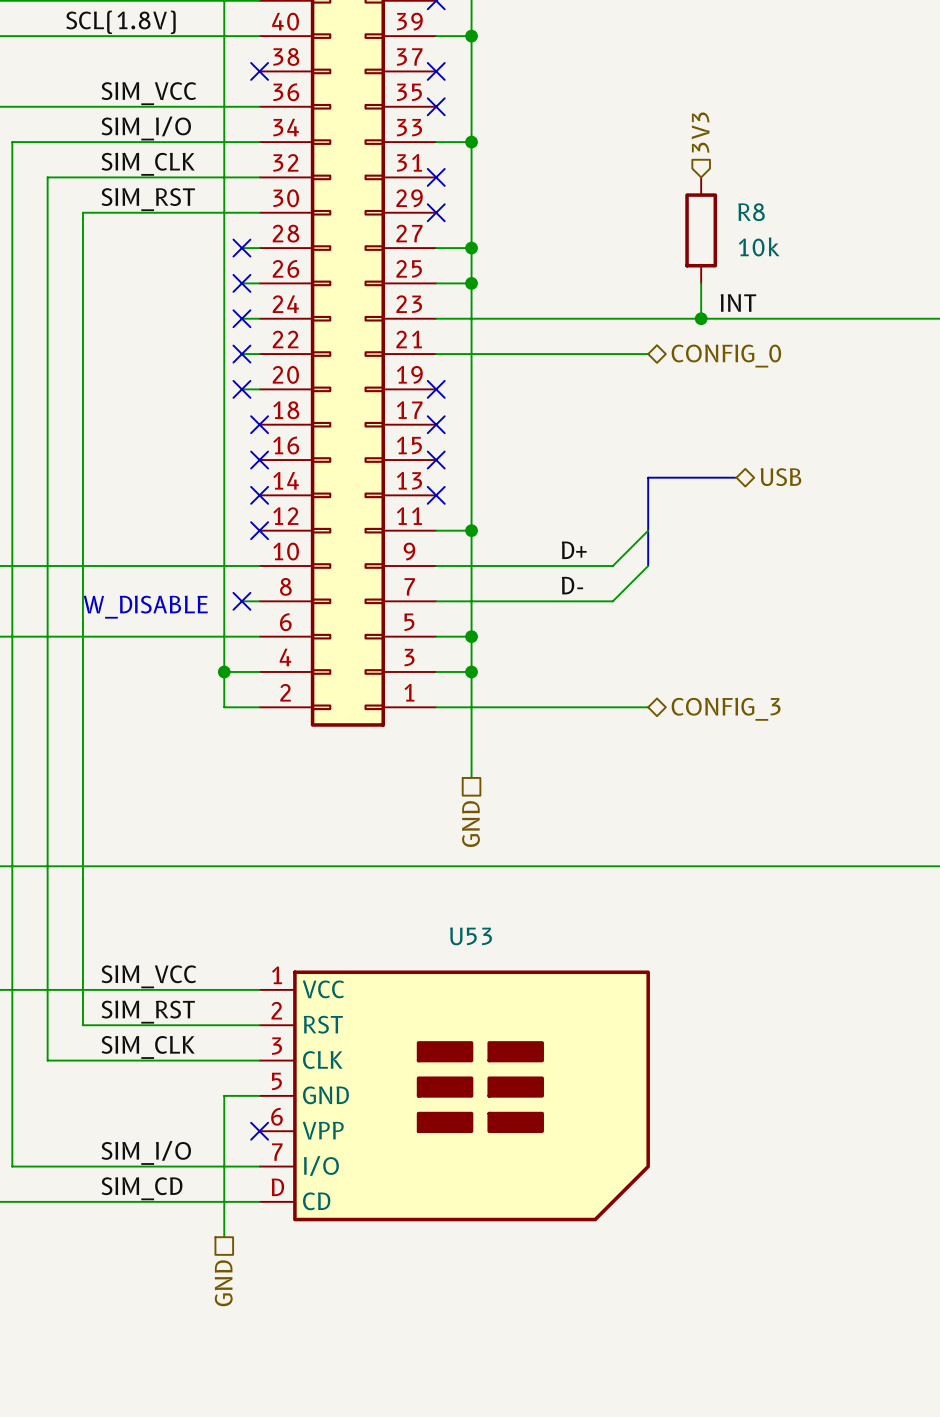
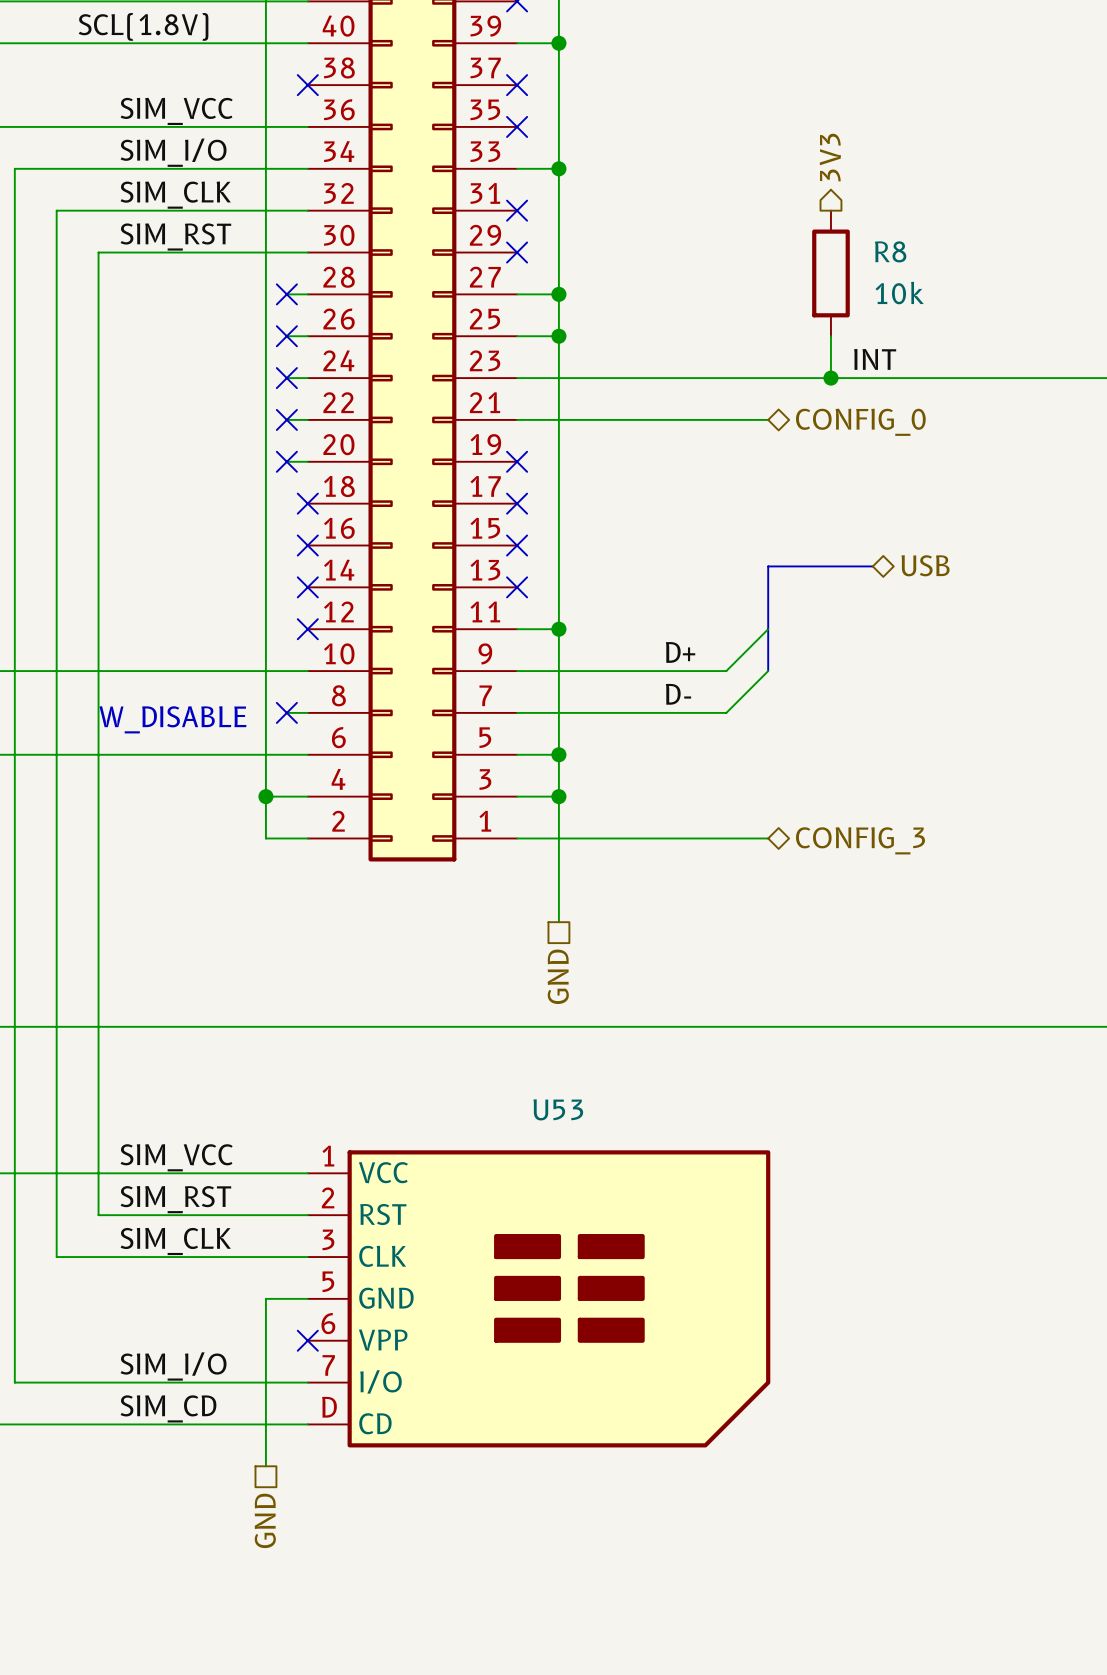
hierarchical label shape: input (700, 132) -> output (830, 157)

